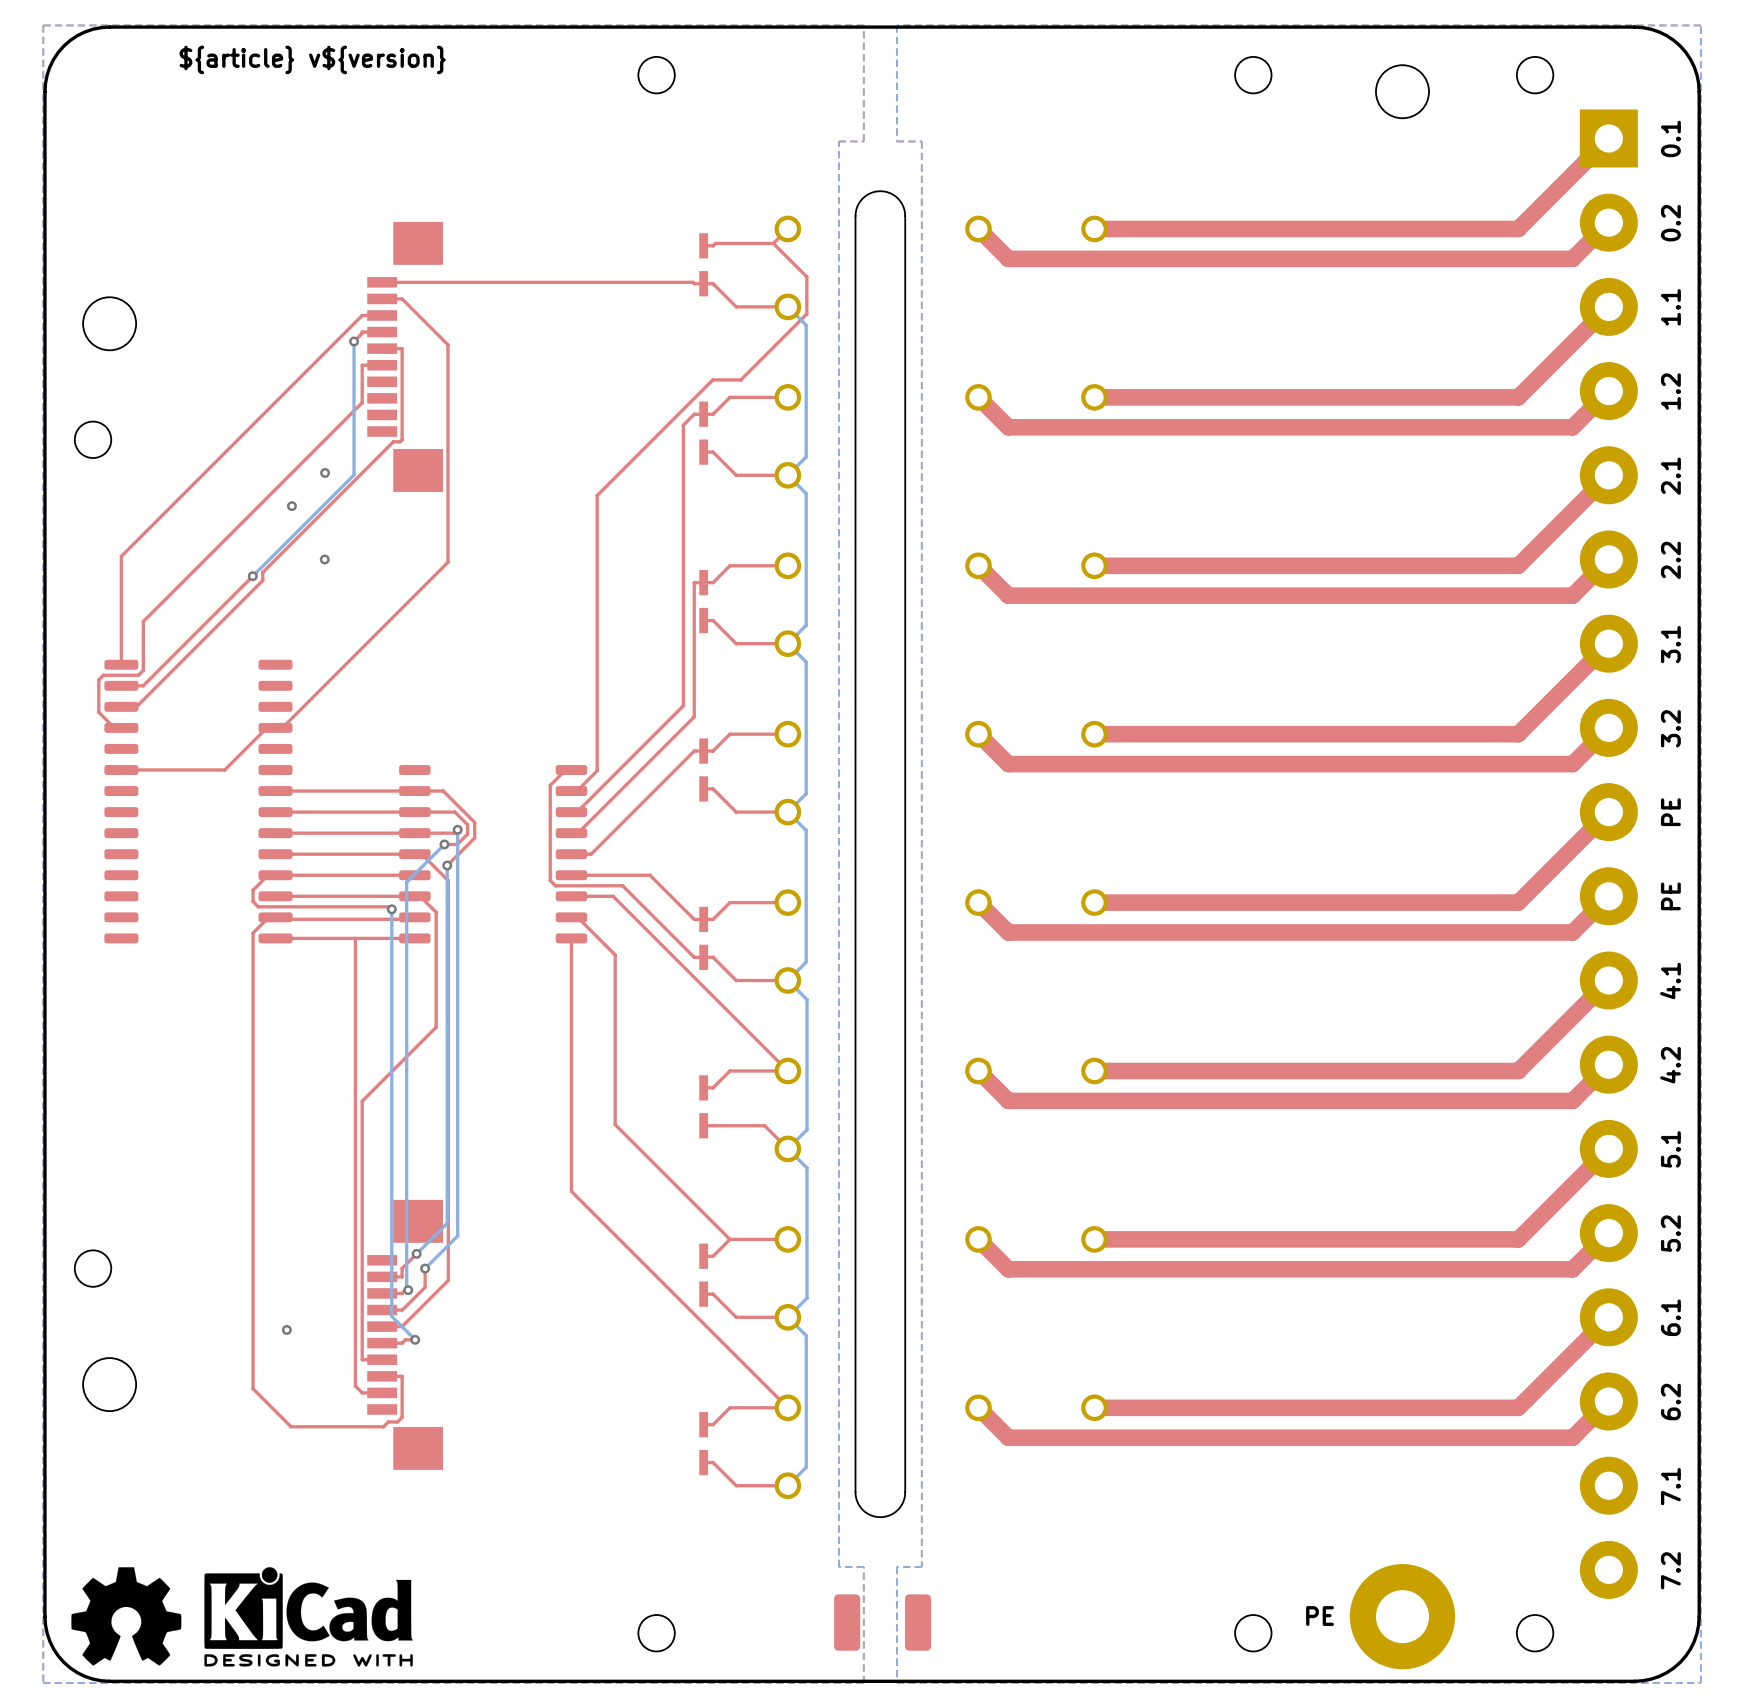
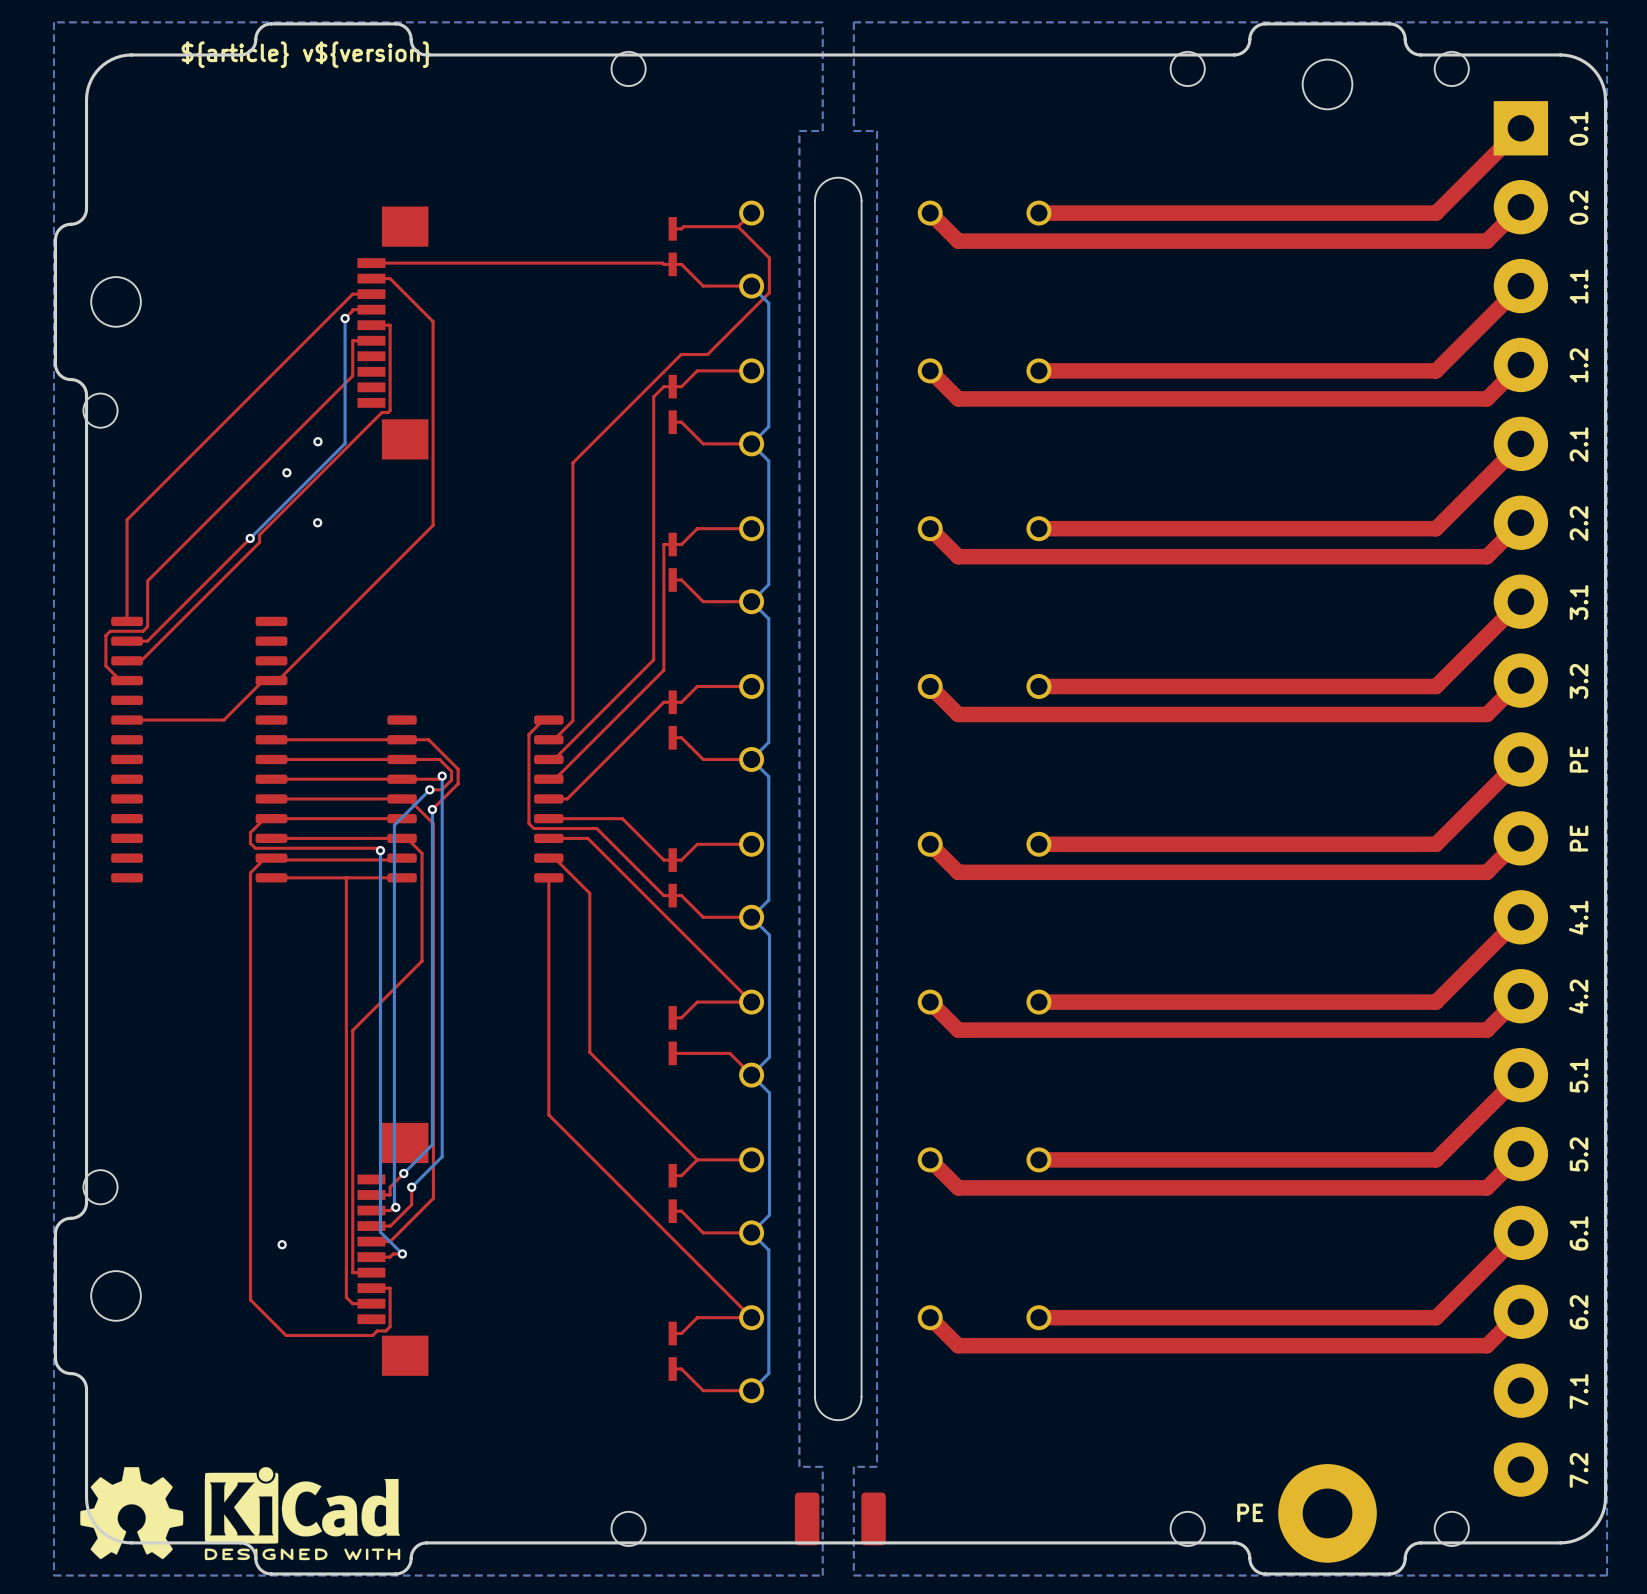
board edge: (275, 27) (101, 27) (77, 35) (63, 46) (49, 66) (45, 83) (44, 257) -> (271, 23) (260, 28) (253, 47) (243, 54) (126, 55) (112, 59) (99, 68) (90, 80) (86, 94) (86, 212) (79, 221) (60, 228) (55, 239)
board edge: (1336, 27) (407, 27) -> (1265, 23) (1254, 28) (1246, 49) (1241, 53) (1234, 54) (426, 54) (415, 50) (407, 29) (402, 25) (395, 23)
board edge: (1468, 27) (1634, 27) (1659, 32) (1673, 40) (1690, 59) (1698, 83) (1699, 108) -> (1389, 23) (1400, 28) (1407, 47) (1417, 54) (1560, 54) (1575, 57) (1588, 64) (1598, 76) (1604, 89) (1605, 100)
board edge: (44, 390) (44, 1318) -> (55, 364) (60, 375) (80, 382) (84, 388) (86, 395) (86, 1202) (81, 1213) (61, 1221) (57, 1227) (55, 1233)
board edge: (44, 1450) (45, 1625) (49, 1641) (63, 1662) (84, 1676) (101, 1680) (275, 1681) -> (55, 1358) (60, 1369) (79, 1375) (86, 1385) (86, 1502) (90, 1517) (99, 1529) (112, 1538) (126, 1542) (243, 1543) (253, 1550) (260, 1569) (271, 1573)
board edge: (1699, 1600) (1698, 1625) (1690, 1648) (1673, 1667) (1659, 1676) (1634, 1681) (1468, 1681) -> (1605, 1497) (1603, 1512) (1595, 1525) (1588, 1533) (1575, 1540) (1560, 1542) (1417, 1543) (1407, 1550) (1400, 1569) (1389, 1573)
board edge: (1336, 1681) (407, 1681) -> (1265, 1573) (1258, 1572) (1253, 1568) (1245, 1547) (1234, 1542) (426, 1542) (419, 1544) (414, 1548) (406, 1569) (395, 1573)

